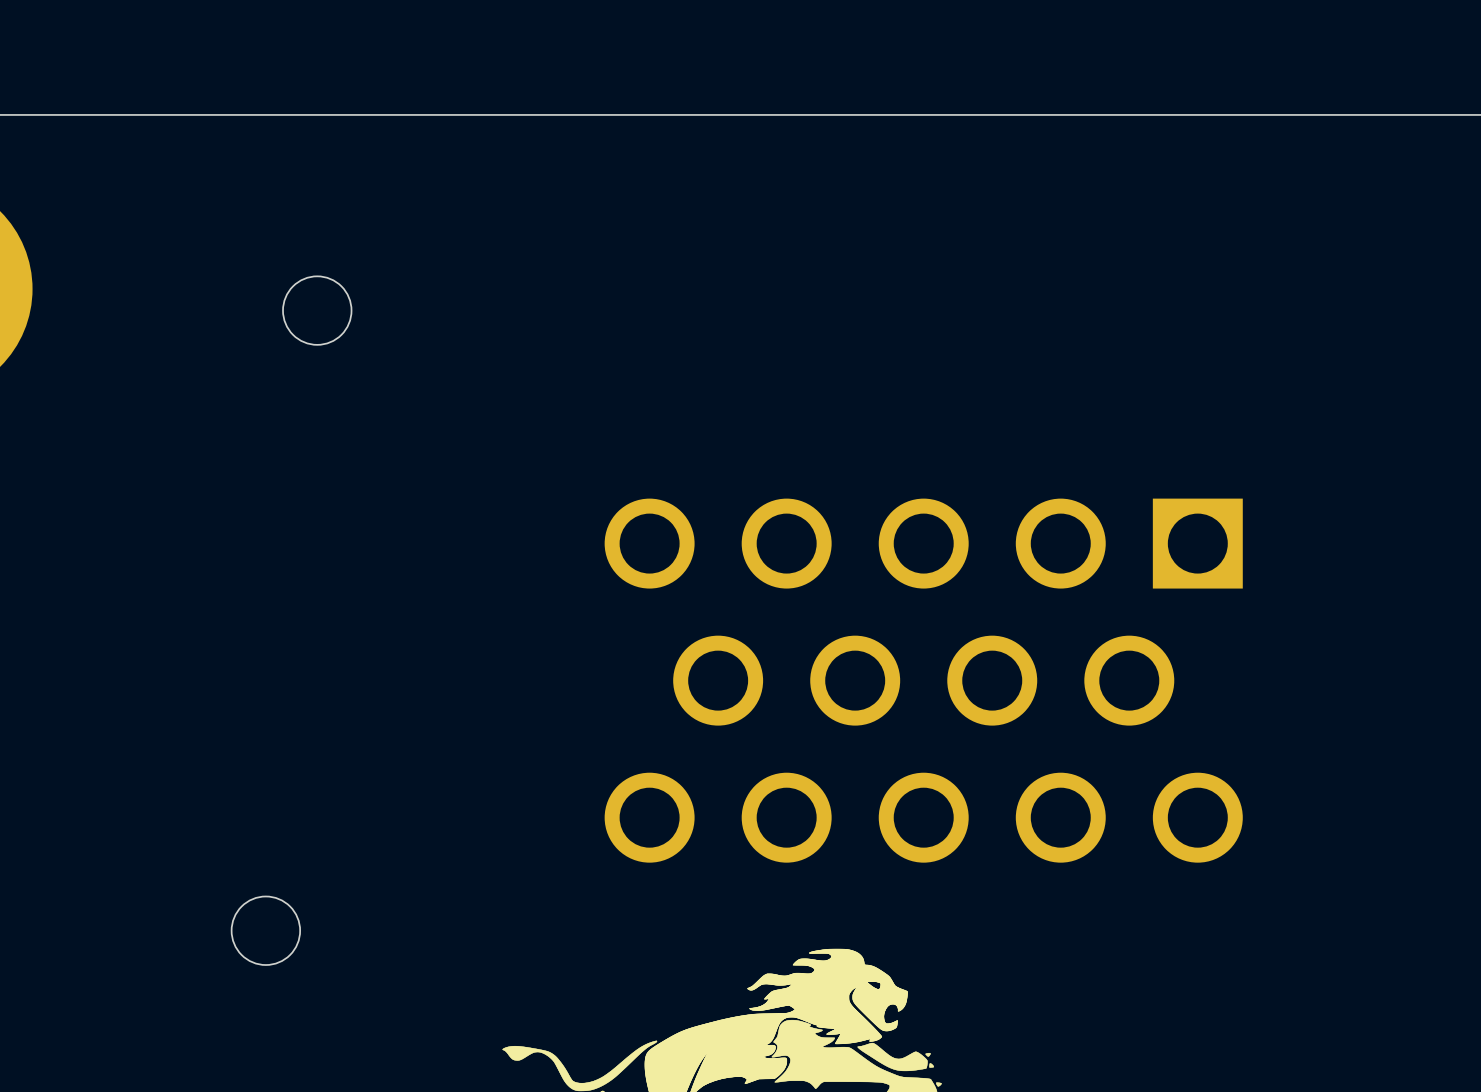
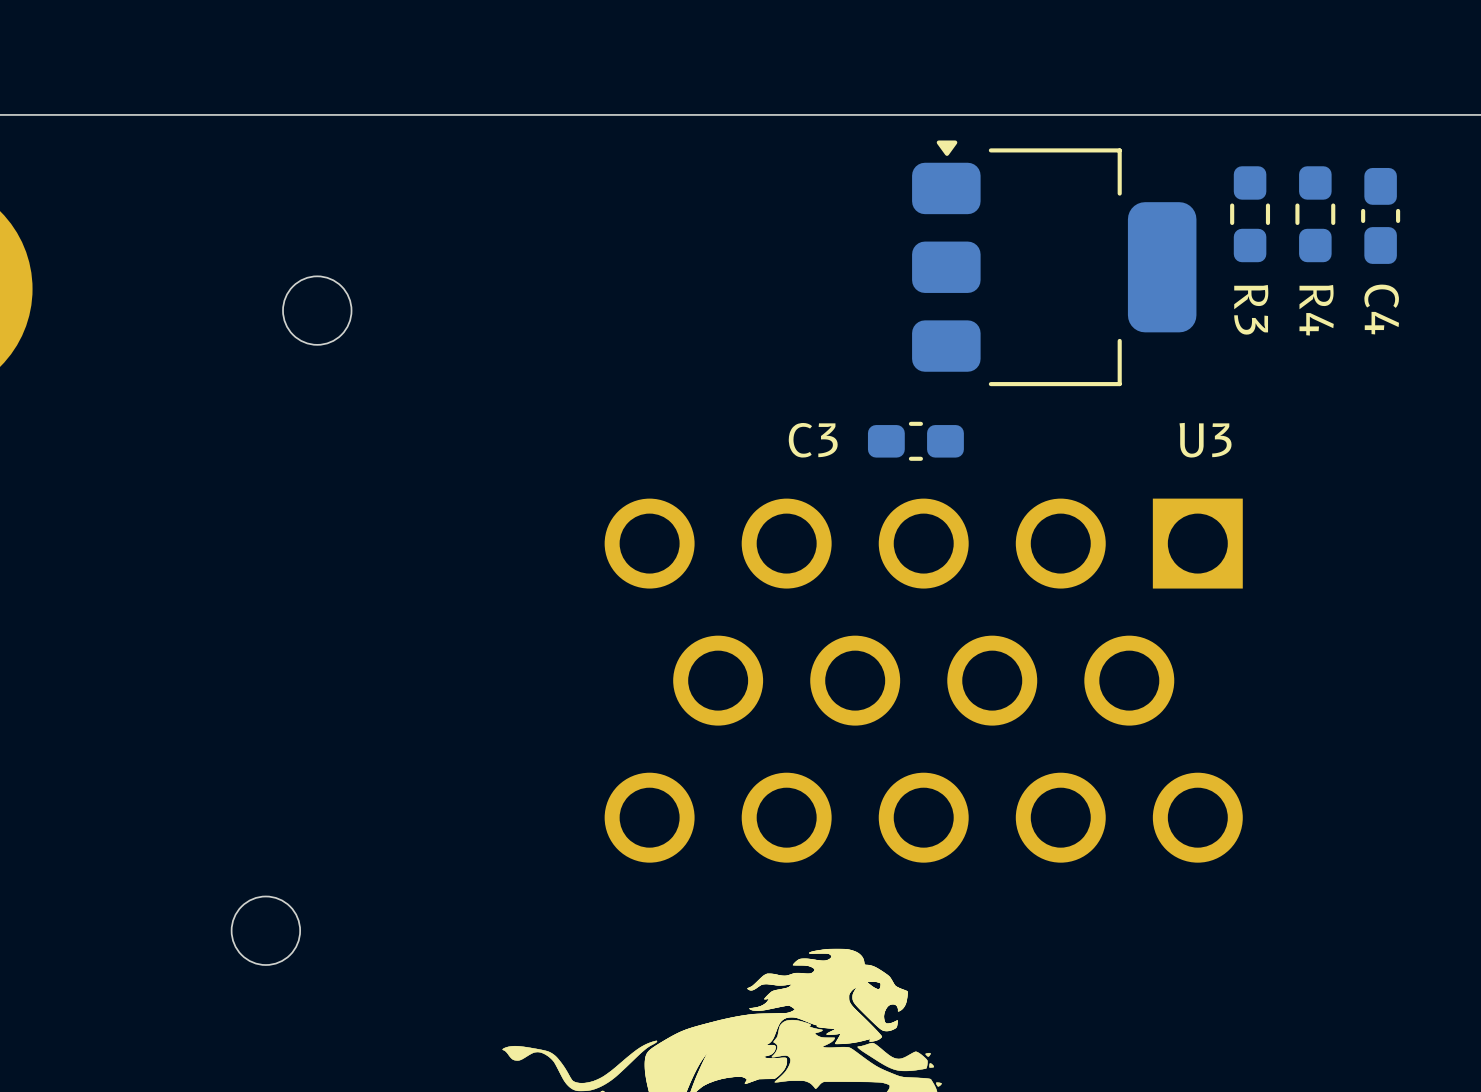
R3: none -> (1250, 214)
R4: none -> (1315, 214)
C4: none -> (1380, 215)
U3: none -> (1054, 263)
C3: none -> (915, 441)

